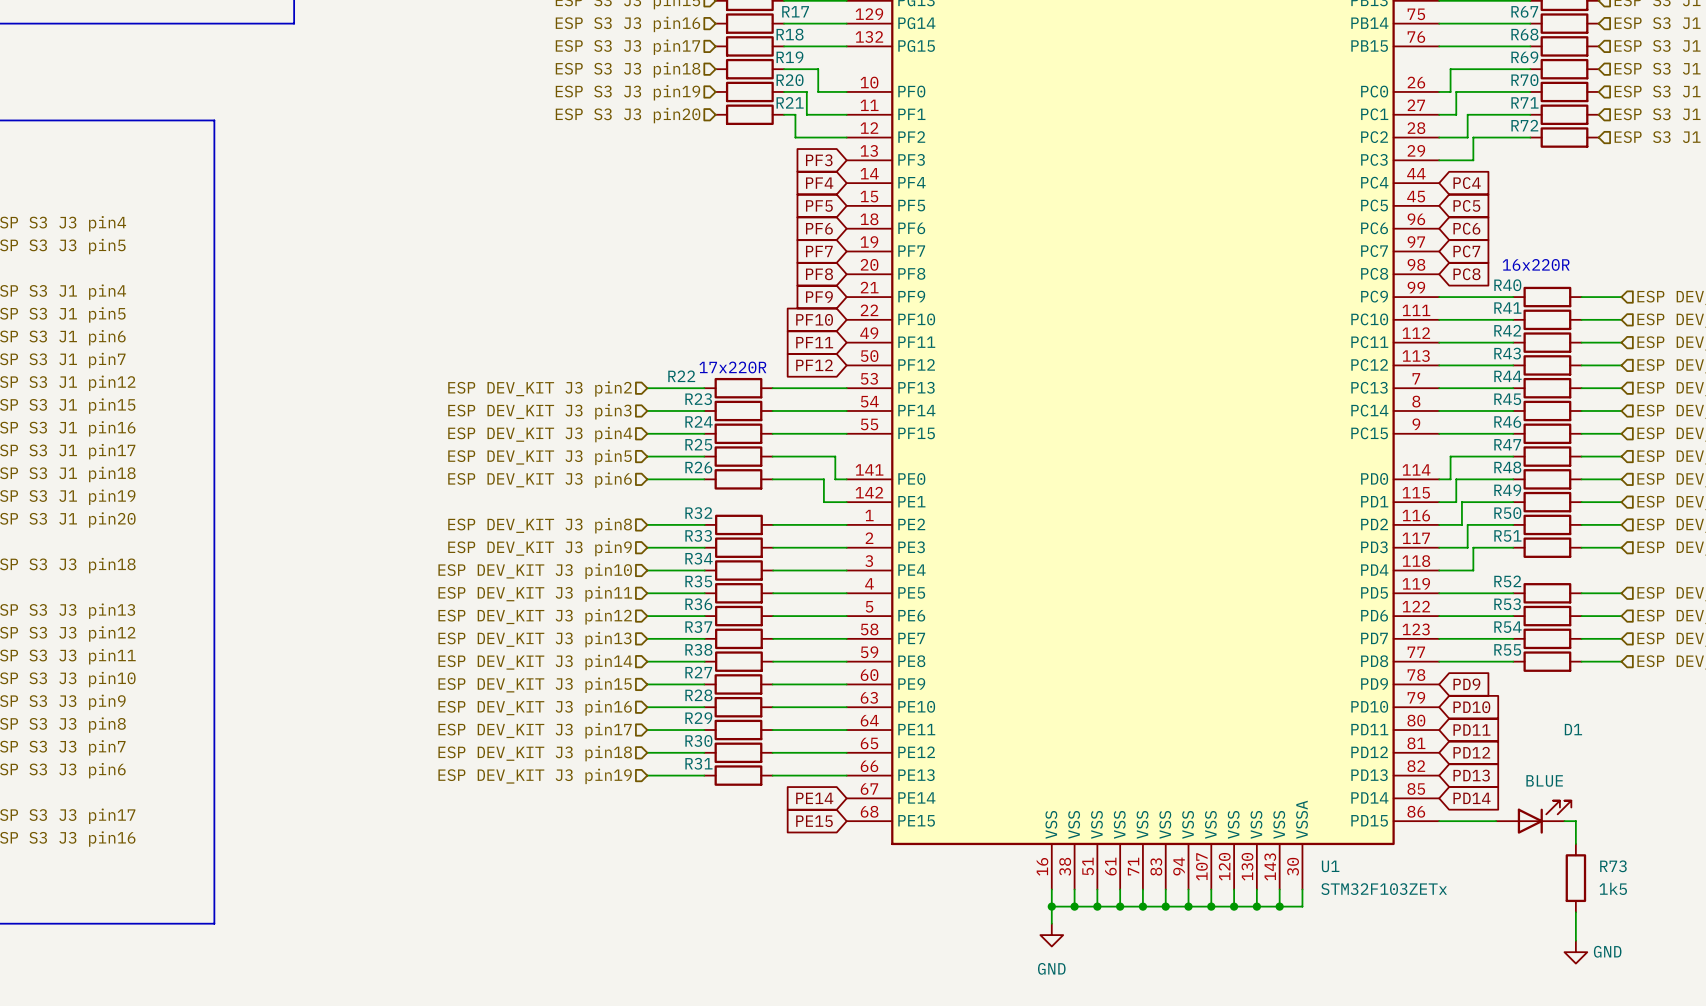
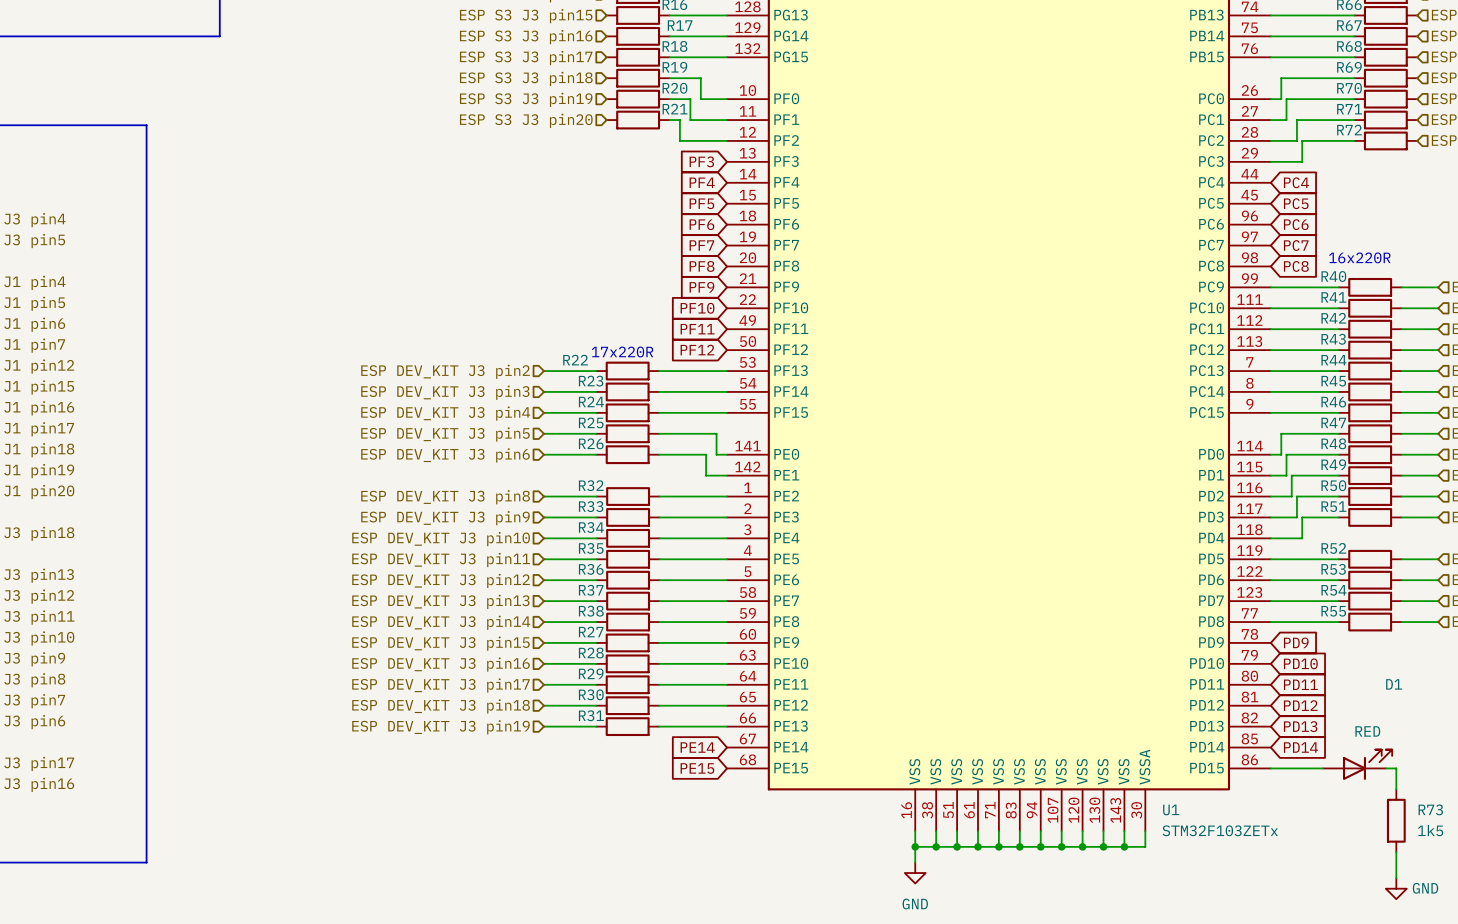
D1 value: BLUE (1544, 780) -> RED (1367, 731)

